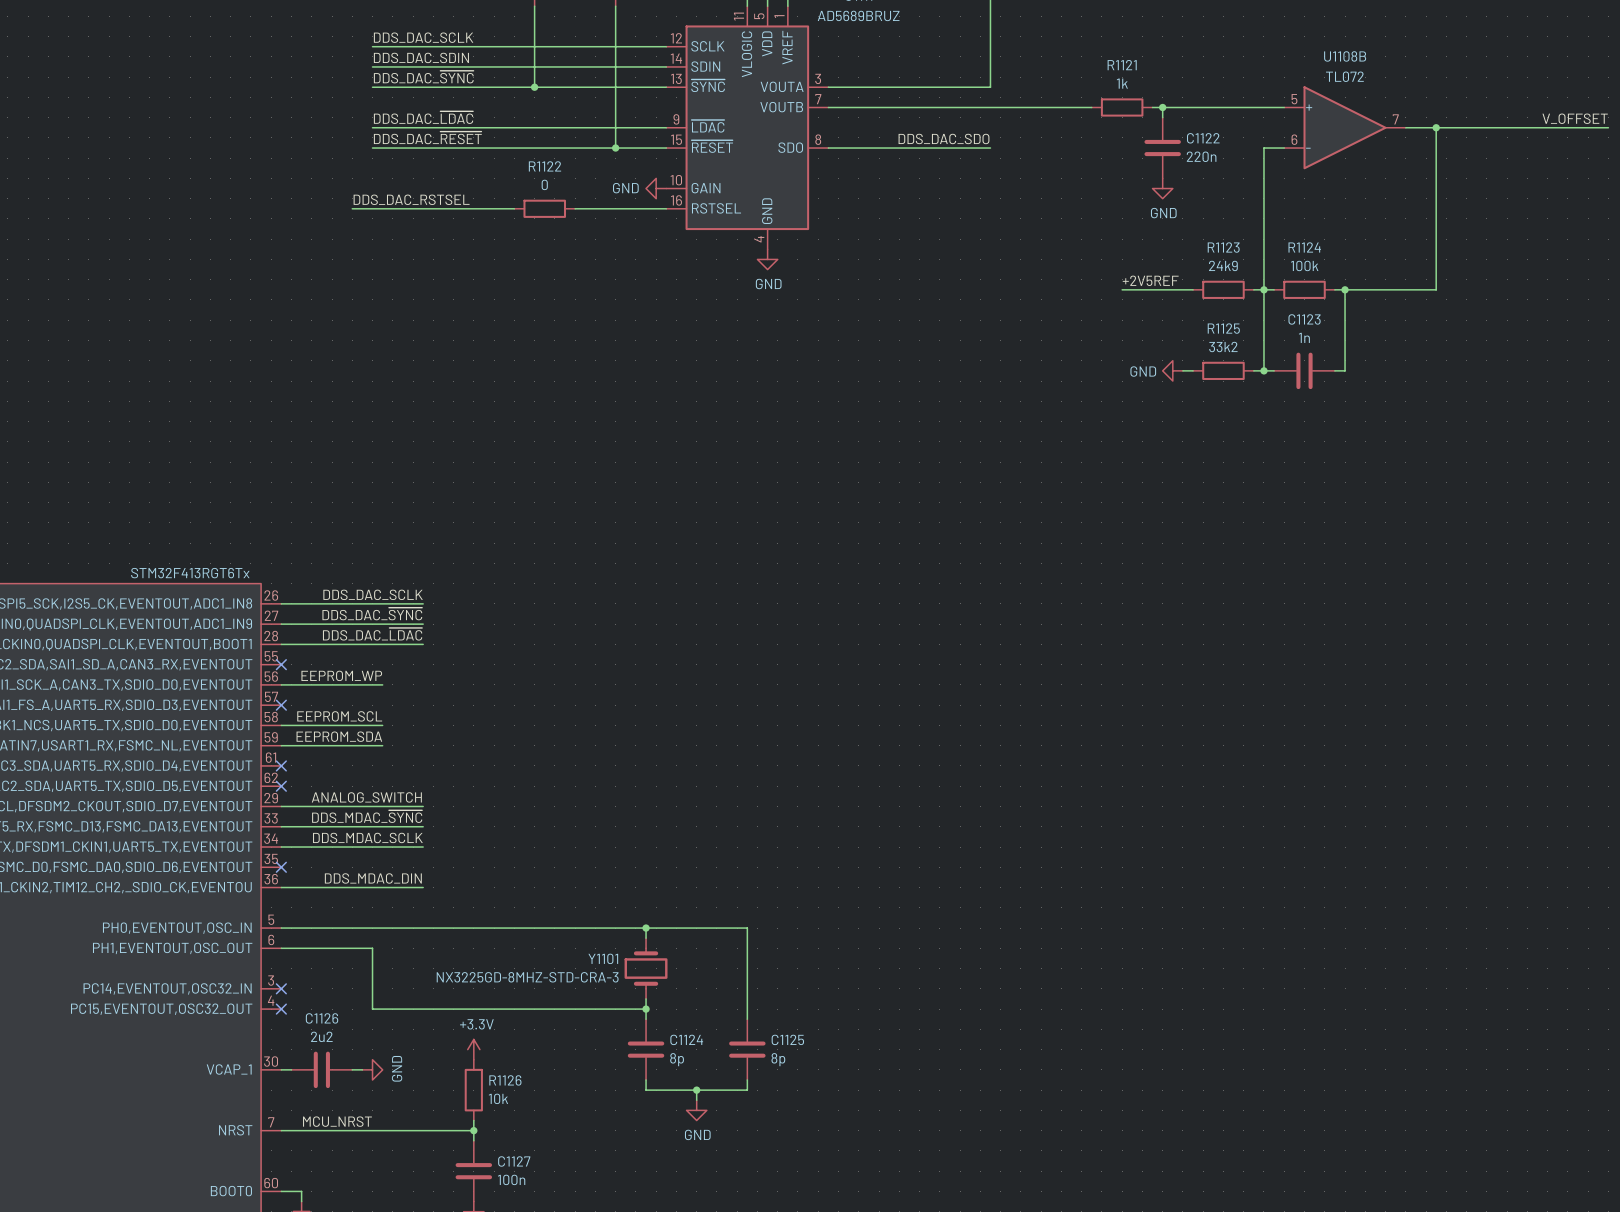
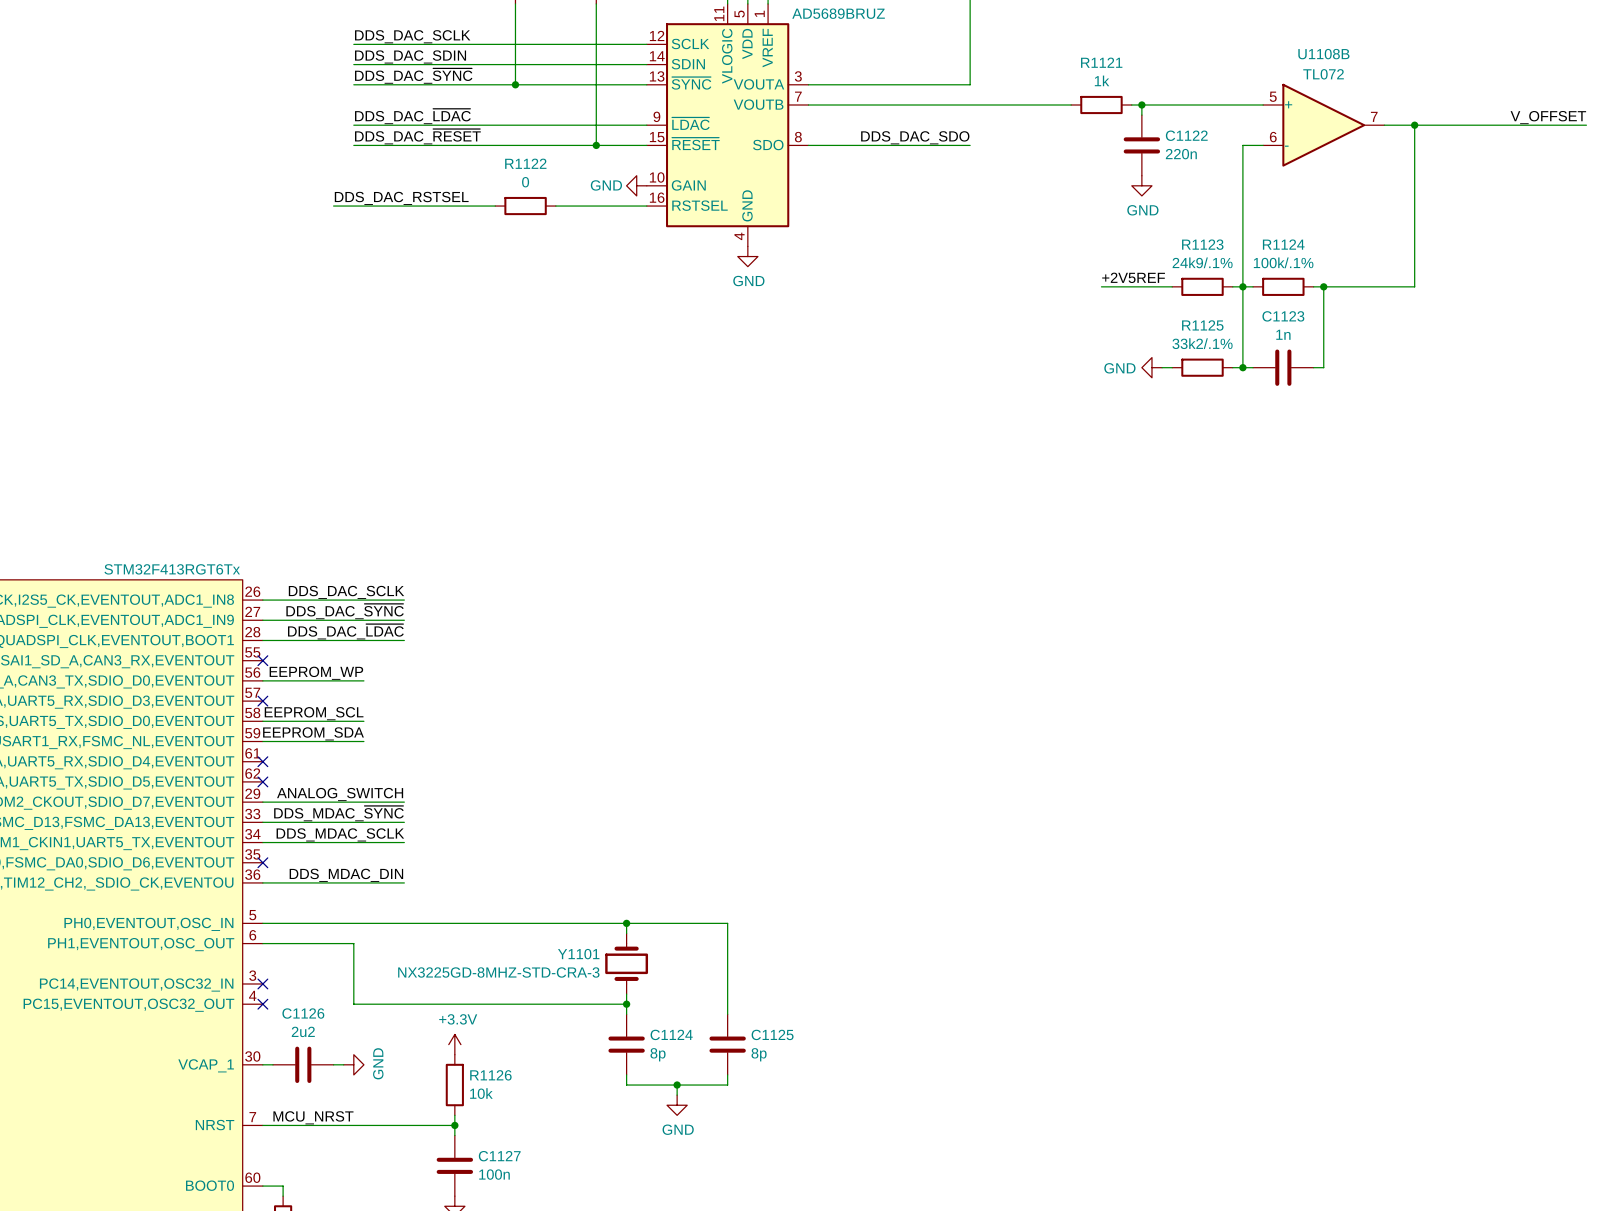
R1123 value: 24k9 (1223, 265) -> 24k9/.1% (1202, 262)
R1124 value: 100k (1304, 265) -> 100k/.1% (1283, 262)
R1125 value: 33k2 (1223, 347) -> 33k2/.1% (1202, 343)

